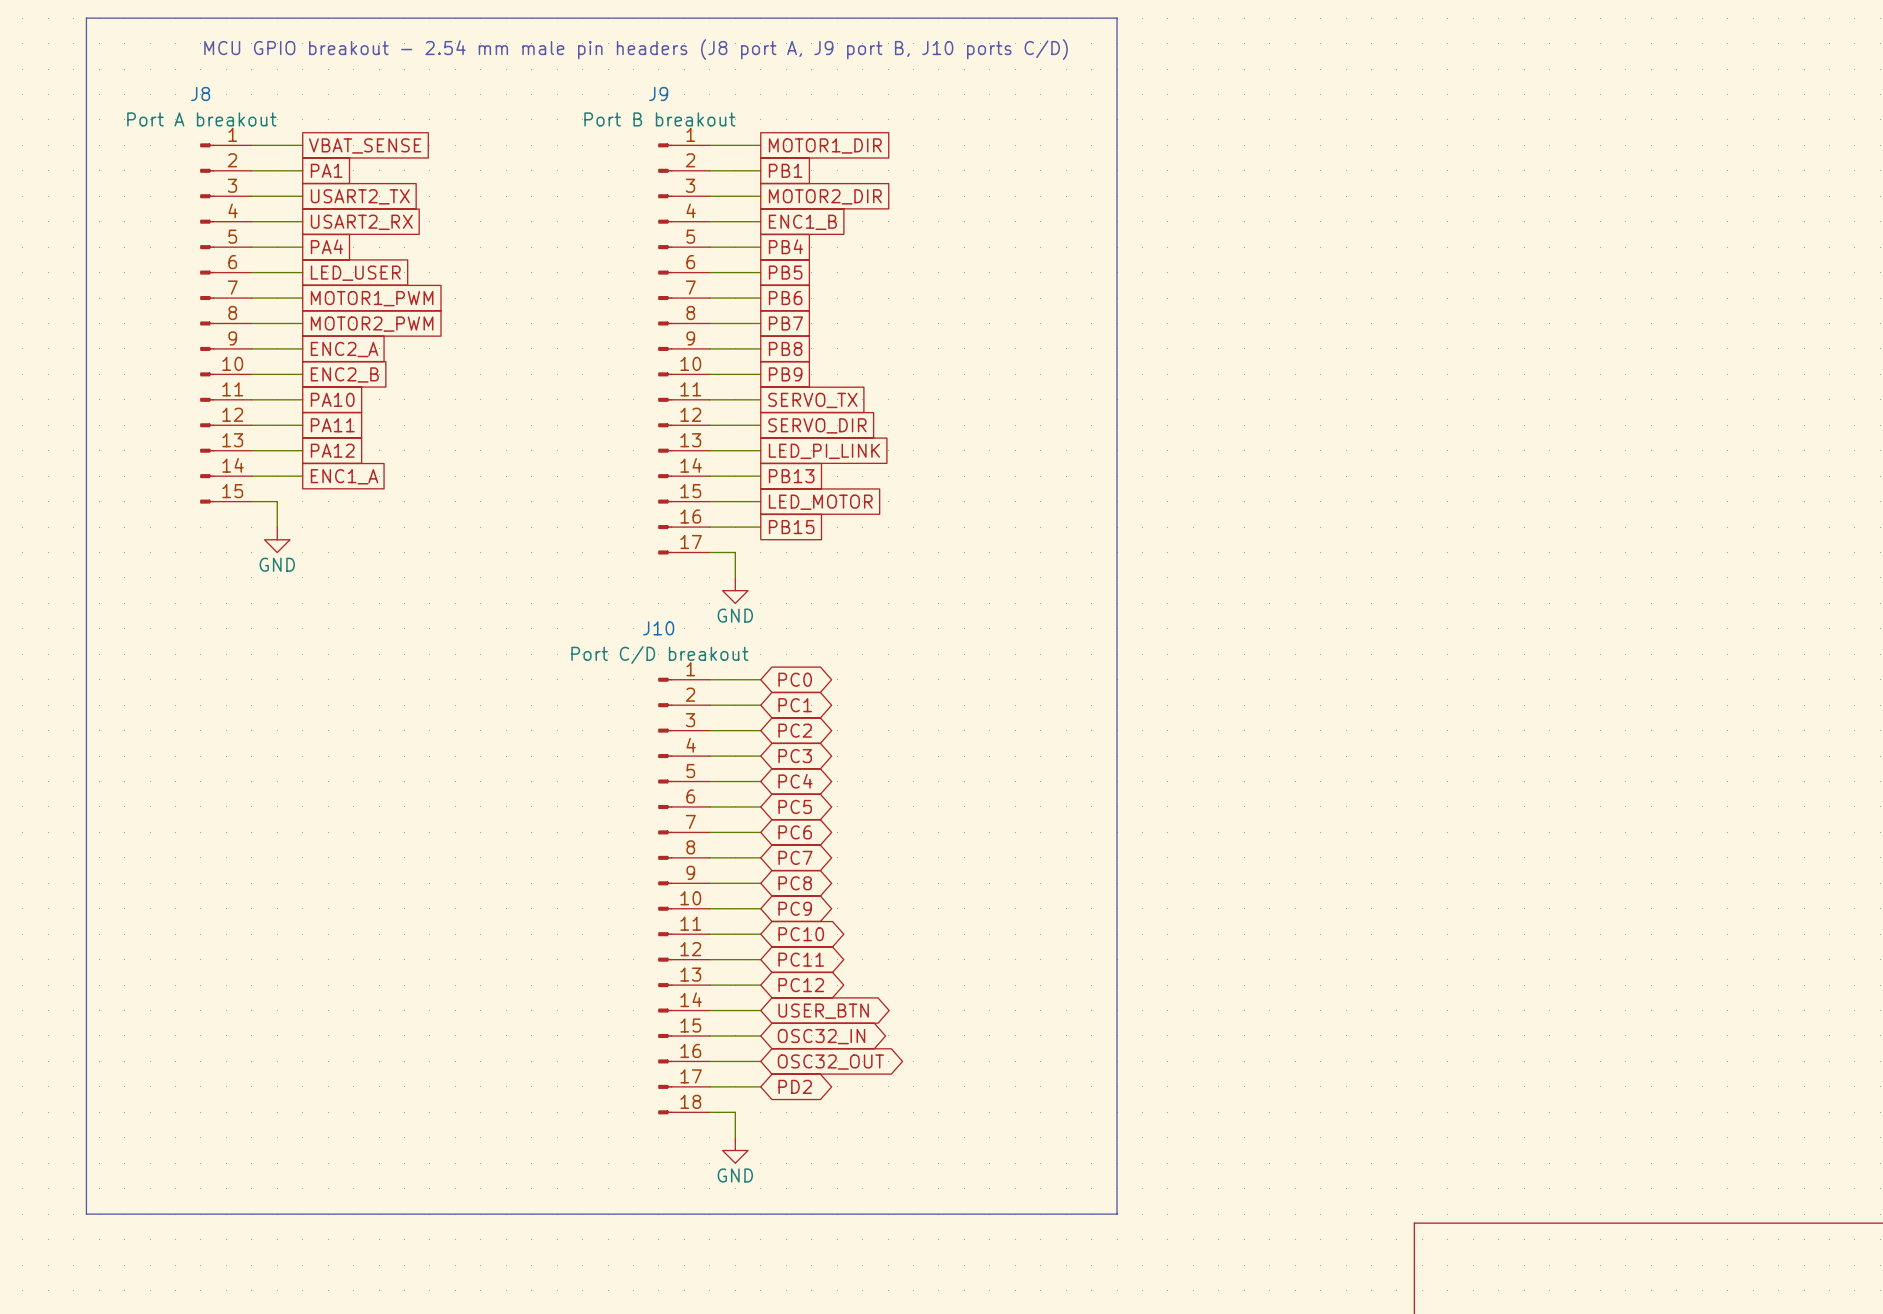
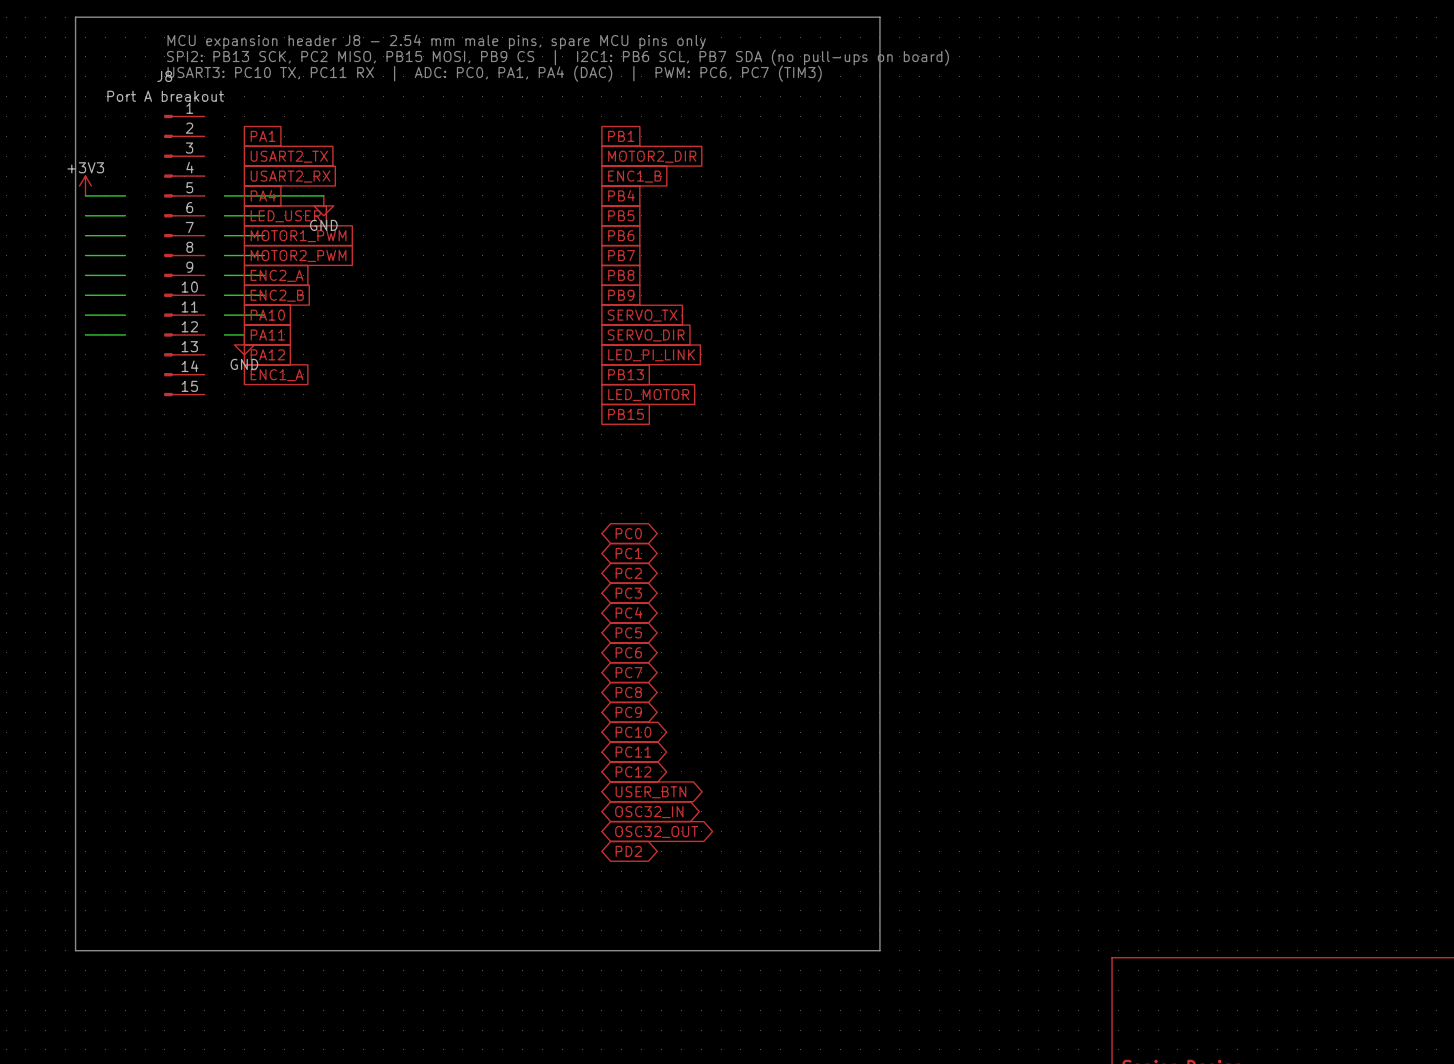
text: MCU GPIO breakout - 2.54 mm male pin headers (J8 port A, J9 port B, J10 ports C/D) (636, 49) -> MCU expansion header J8 - 2.54 mm male pins, spare MCU pins only (436, 41)
text: none -> SPI2: PB13 SCK, PC2 MISO, PB15 MOSI, PB9 CS | I2C1: PB6 SCL, PB7 SDA (no pull-ups on board) (557, 57)
text: none -> USART3: PC10 TX, PC11 RX | ADC: PC0, PA1, PA4 (DAC) | PWM: PC6, PC7 (TIM3) (494, 73)
wire: (251, 145) (302, 145) -> (85, 195) (125, 195)
global label: VBAT_SENSE (365, 145) -> none
wire: (709, 145) (760, 145) -> none
global label: MOTOR1_DIR (825, 145) -> none
wire: (251, 170) (302, 170) -> (85, 215) (125, 215)
wire: (709, 170) (760, 170) -> none
wire: (251, 196) (302, 196) -> (85, 235) (125, 235)
wire: (709, 196) (760, 196) -> none
wire: (251, 221) (302, 221) -> (85, 255) (125, 255)
wire: (709, 221) (760, 221) -> none
power symbol: none -> +3V3 (85, 186)
wire: (251, 247) (277, 247) -> none
wire: none -> (244, 195) (323, 195)
wire: (709, 247) (760, 247) -> none
power symbol: none -> GND (323, 205)
wire: (251, 272) (277, 272) -> (244, 215) (264, 215)
wire: (709, 272) (760, 272) -> none
wire: (251, 298) (277, 298) -> (244, 235) (264, 235)
wire: (709, 298) (760, 298) -> none
wire: (251, 323) (277, 323) -> (244, 255) (264, 255)
wire: (709, 323) (760, 323) -> none
wire: none -> (85, 275) (125, 275)
wire: (251, 348) (277, 348) -> (244, 275) (264, 275)
J9: Port B breakout (684, 348) -> none
wire: (709, 348) (760, 348) -> none
wire: none -> (85, 295) (125, 295)
wire: (251, 374) (277, 374) -> (244, 295) (264, 295)
wire: (709, 374) (760, 374) -> none
wire: (251, 399) (277, 399) -> (244, 315) (264, 315)
wire: (709, 399) (760, 399) -> none
wire: (251, 425) (277, 425) -> none
wire: (709, 425) (760, 425) -> none
wire: (251, 450) (302, 450) -> (85, 315) (125, 315)
wire: (709, 450) (760, 450) -> none
wire: (251, 476) (302, 476) -> (85, 334) (125, 334)
wire: (709, 476) (760, 476) -> none
wire: (251, 501) (277, 501) (277, 527) -> none
wire: (709, 501) (760, 501) -> none
wire: (709, 527) (760, 527) -> none
power symbol position: GND (277, 539) -> GND (244, 344)
wire: (709, 552) (735, 552) (735, 577) -> none
power symbol: GND (735, 590) -> none
wire: (709, 679) (760, 679) -> none
wire: (709, 705) (760, 705) -> none
wire: (709, 730) (760, 730) -> none
wire: (709, 756) (760, 756) -> none
wire: (709, 781) (760, 781) -> none
wire: (709, 806) (760, 806) -> none
wire: (709, 832) (760, 832) -> none
wire: (709, 857) (760, 857) -> none
wire: (709, 883) (760, 883) -> none
J10: Port C/D breakout (684, 896) -> none
wire: (709, 908) (760, 908) -> none
wire: (709, 934) (760, 934) -> none
wire: (709, 959) (760, 959) -> none
wire: (709, 985) (760, 985) -> none
wire: (709, 1010) (760, 1010) -> none
wire: (709, 1035) (760, 1035) -> none
wire: (709, 1061) (760, 1061) -> none
wire: (709, 1086) (760, 1086) -> none
wire: (709, 1112) (735, 1112) (735, 1137) -> none
power symbol: GND (735, 1150) -> none

